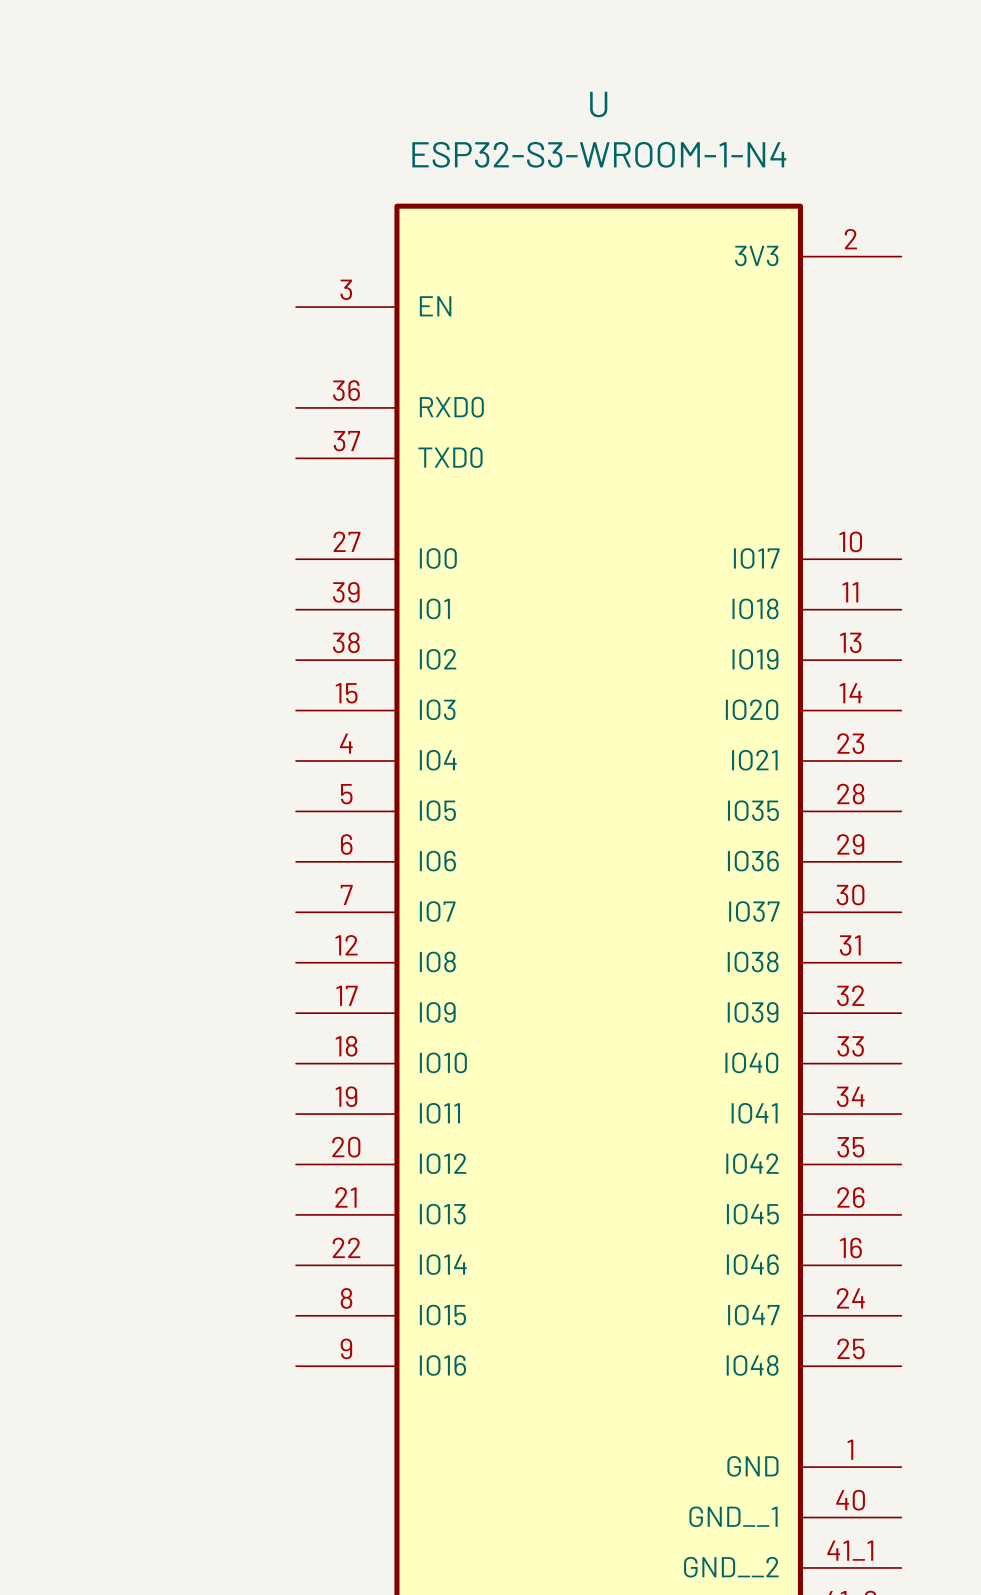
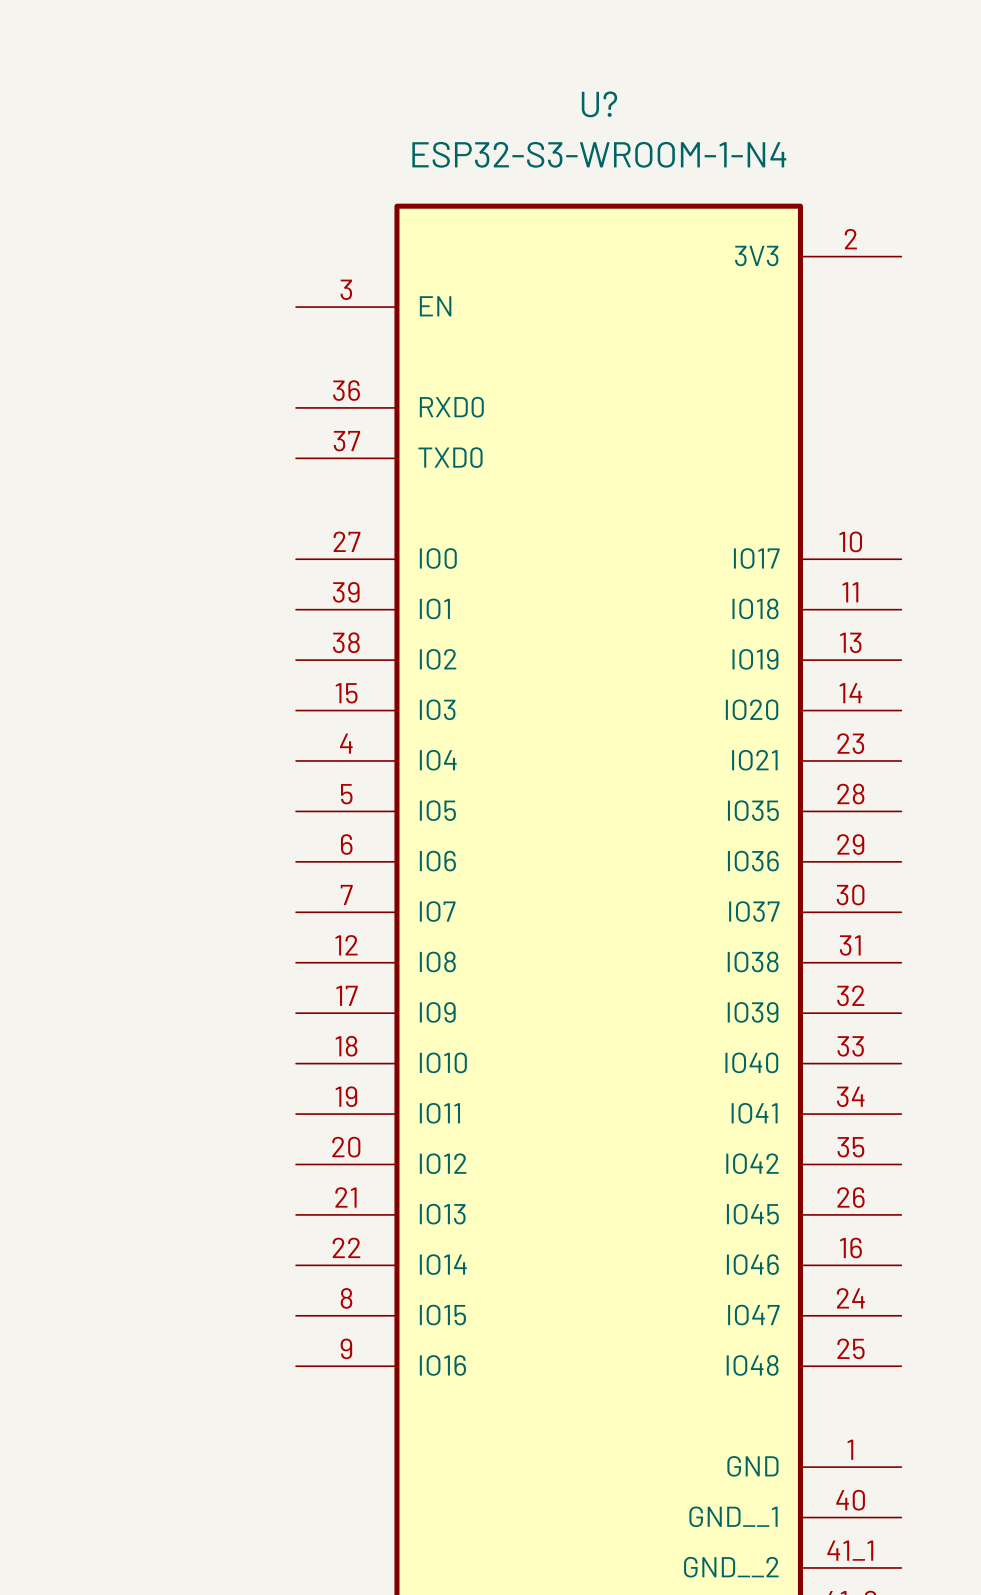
U name: U (598, 104) -> U? (599, 104)

